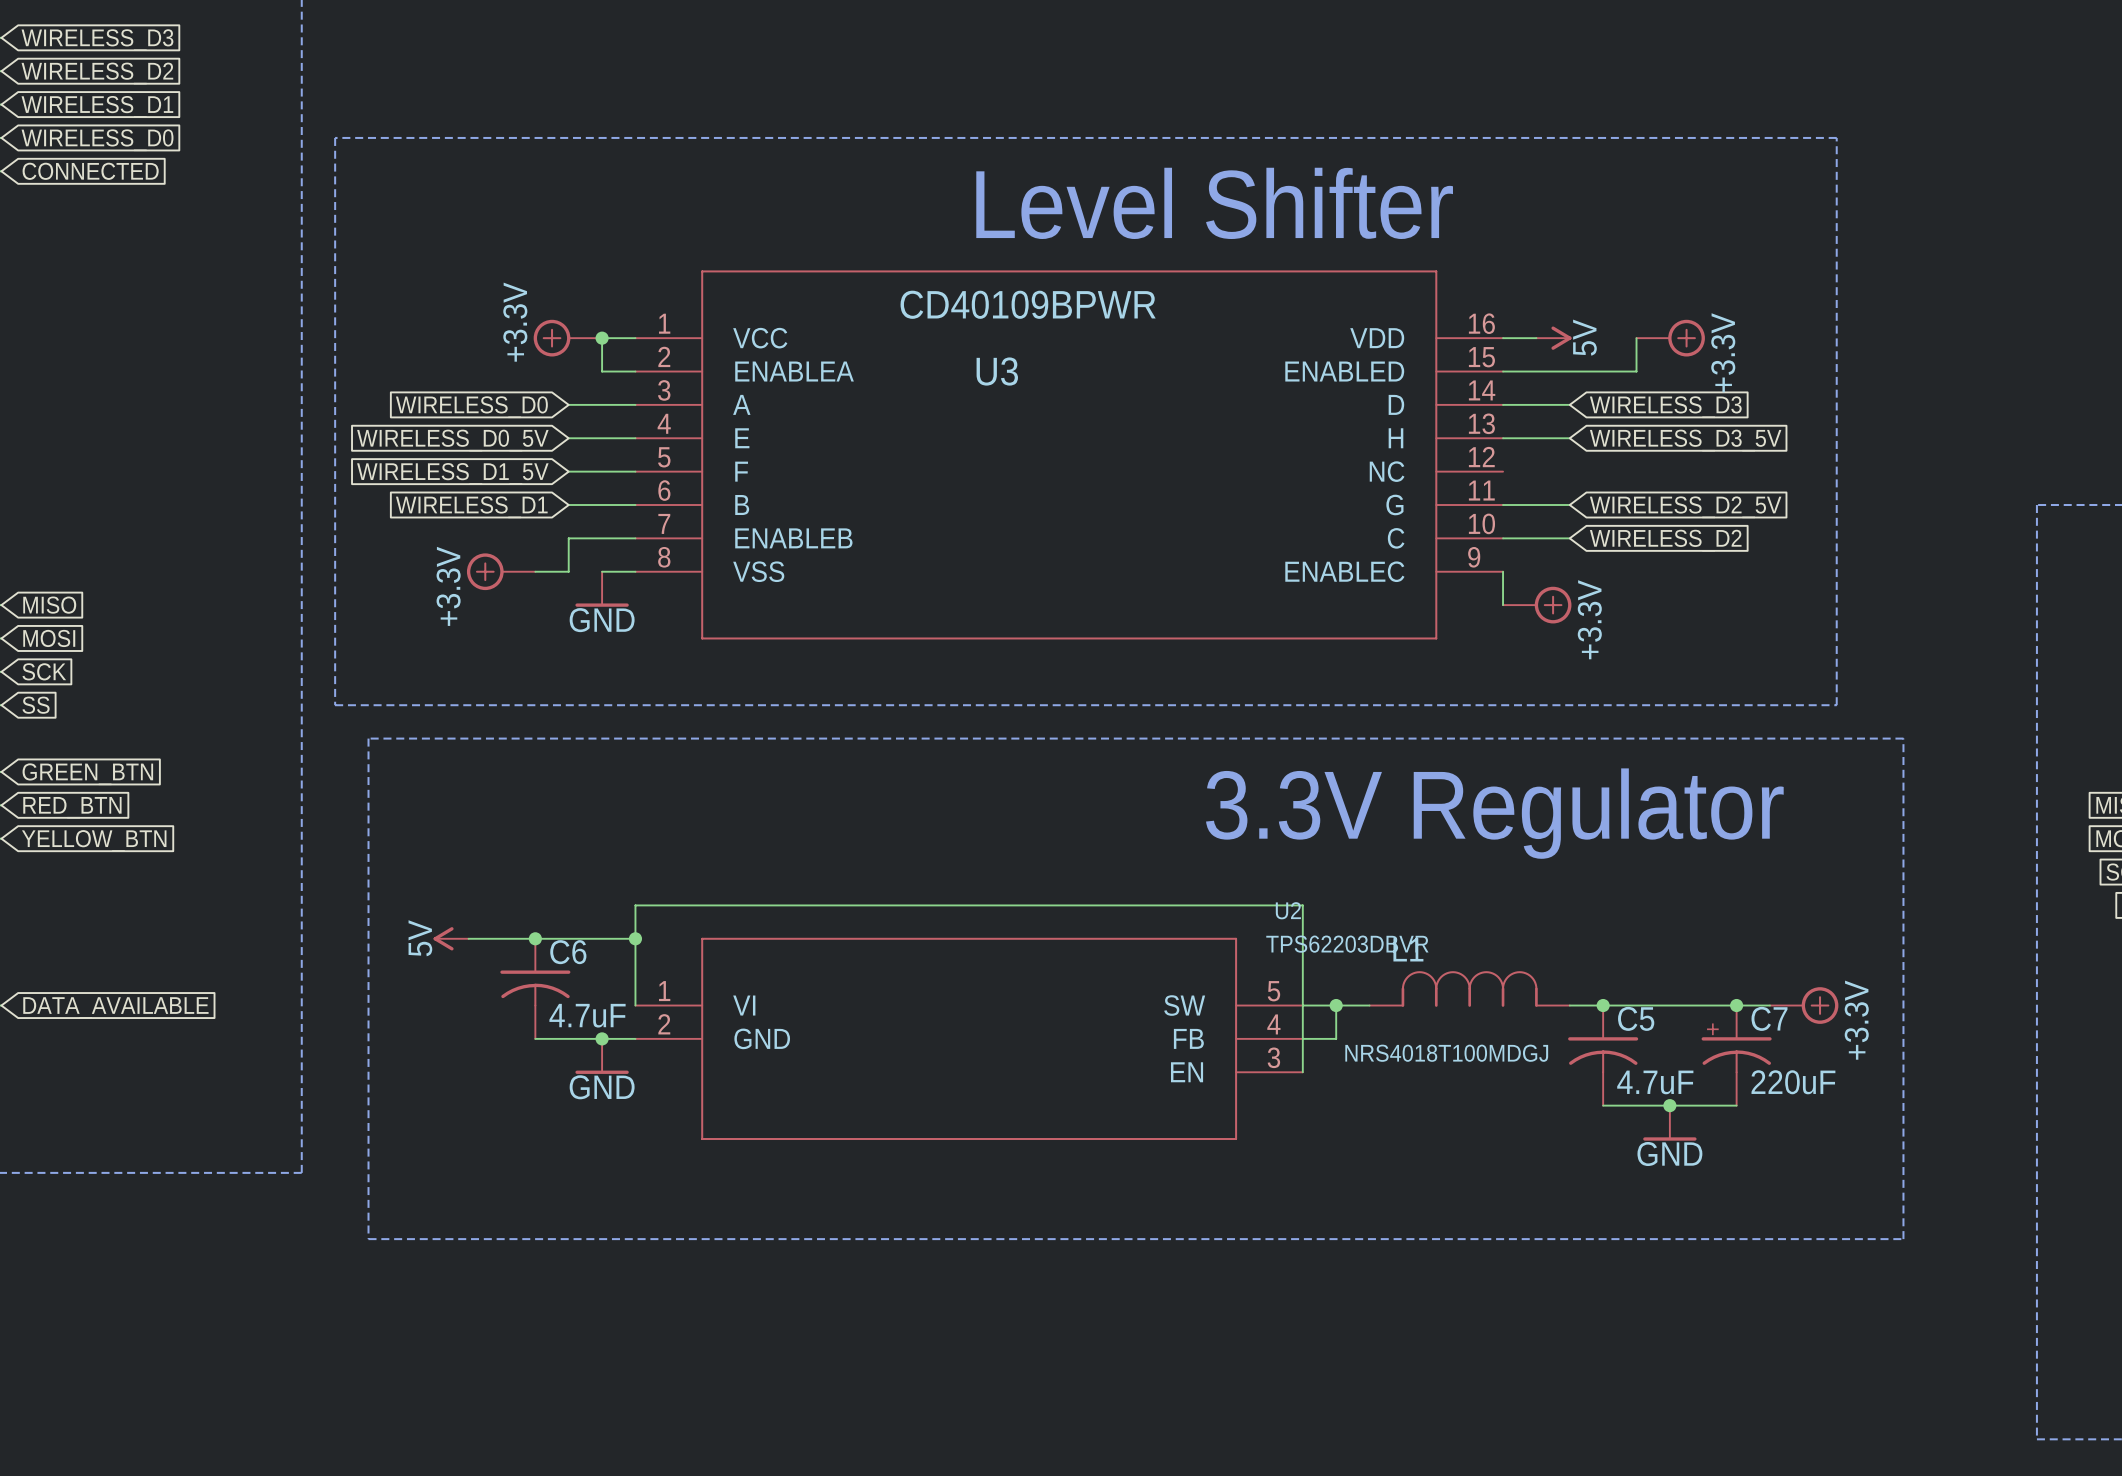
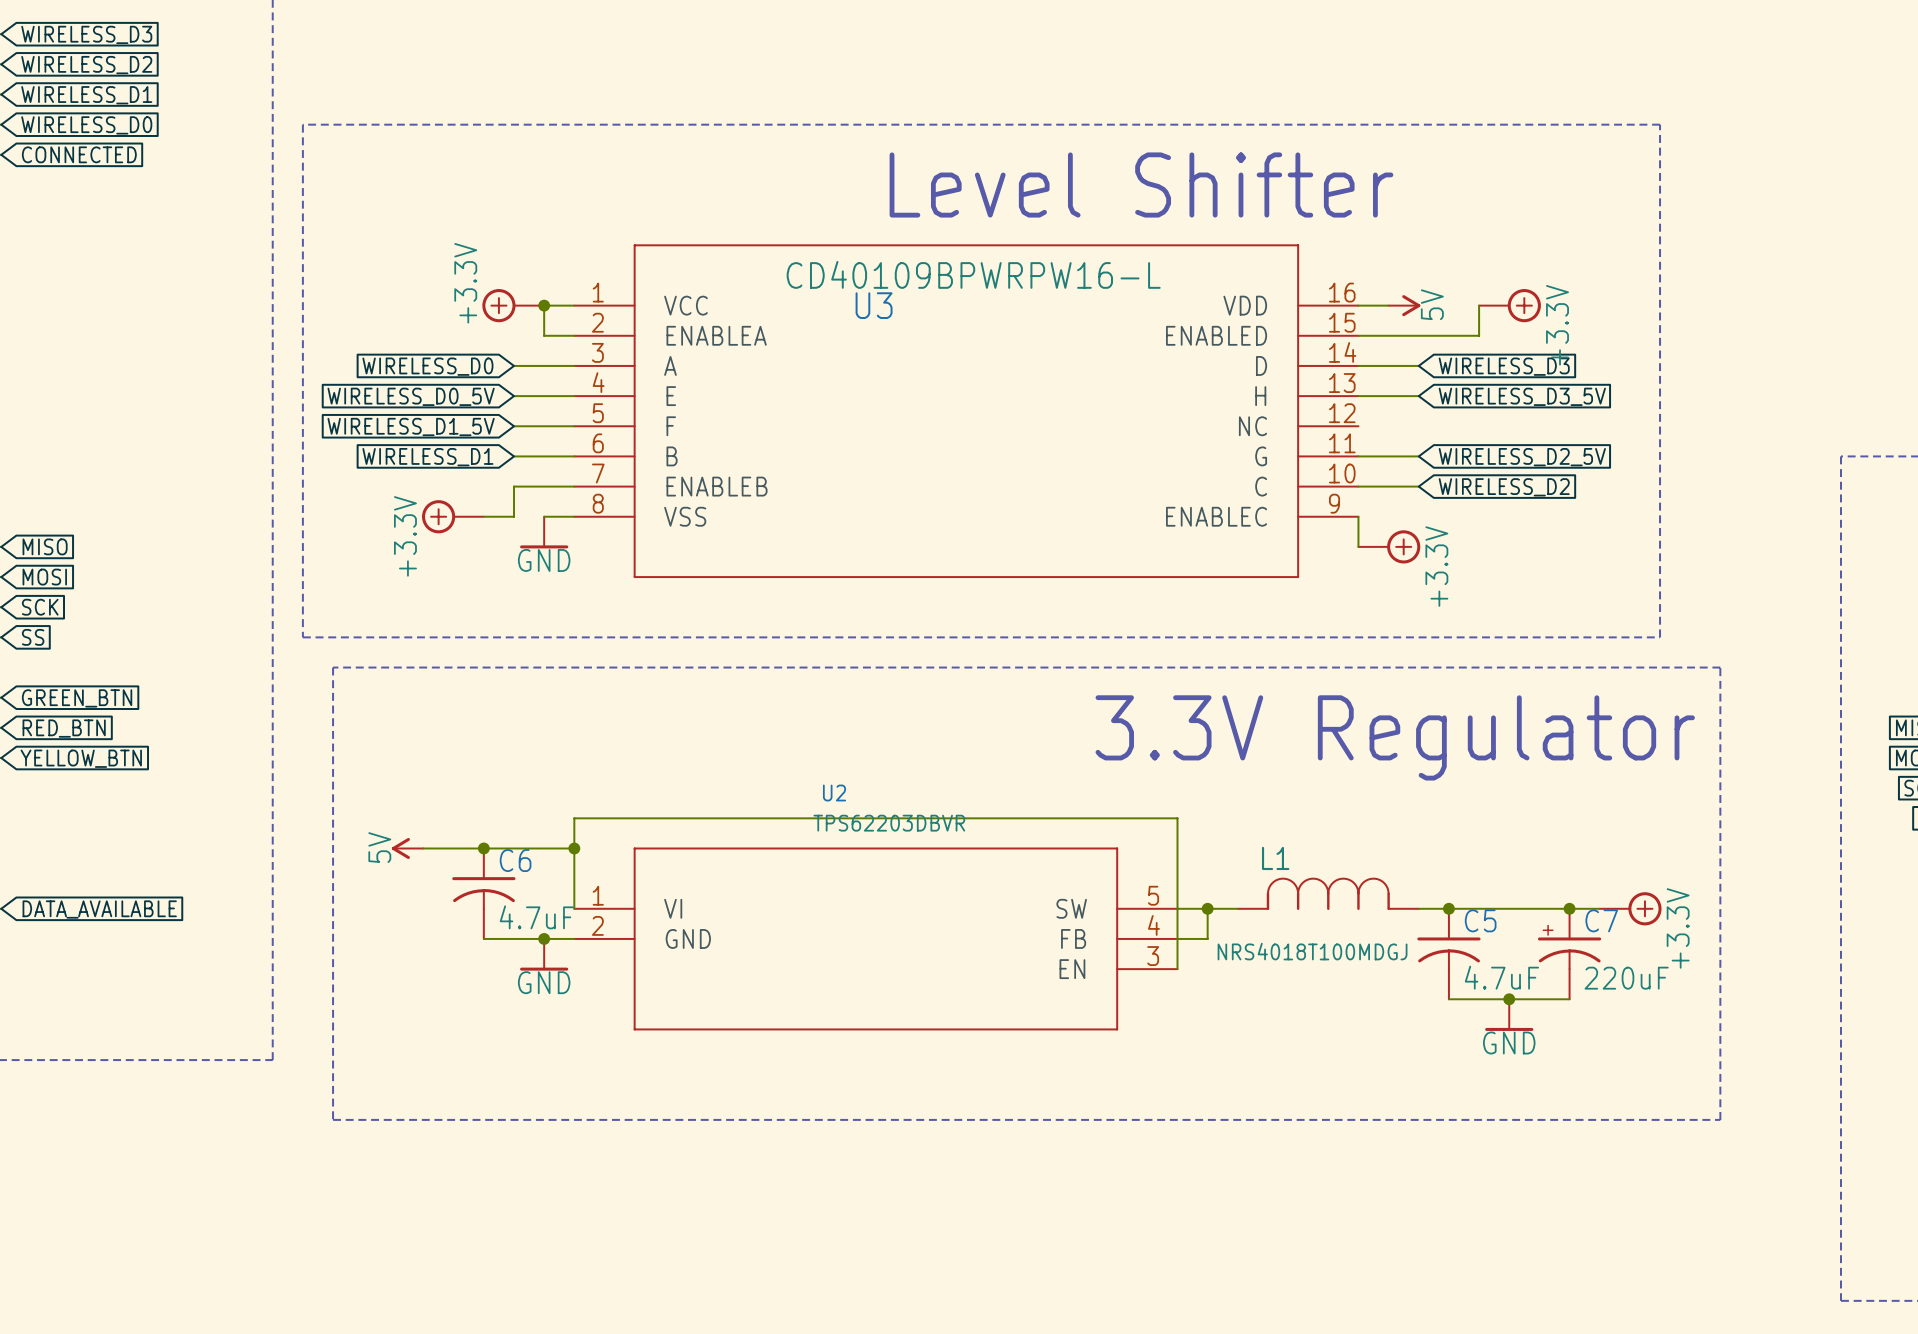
U3 value: CD40109BPWR (1028, 304) -> CD40109BPWRPW16-L (973, 274)
U3 name position: U3 (997, 371) -> U3 (874, 305)
U2 name position: U2 (1288, 910) -> U2 (834, 792)
U2 value position: TPS62203DBVR (1347, 944) -> TPS62203DBVR (889, 823)

